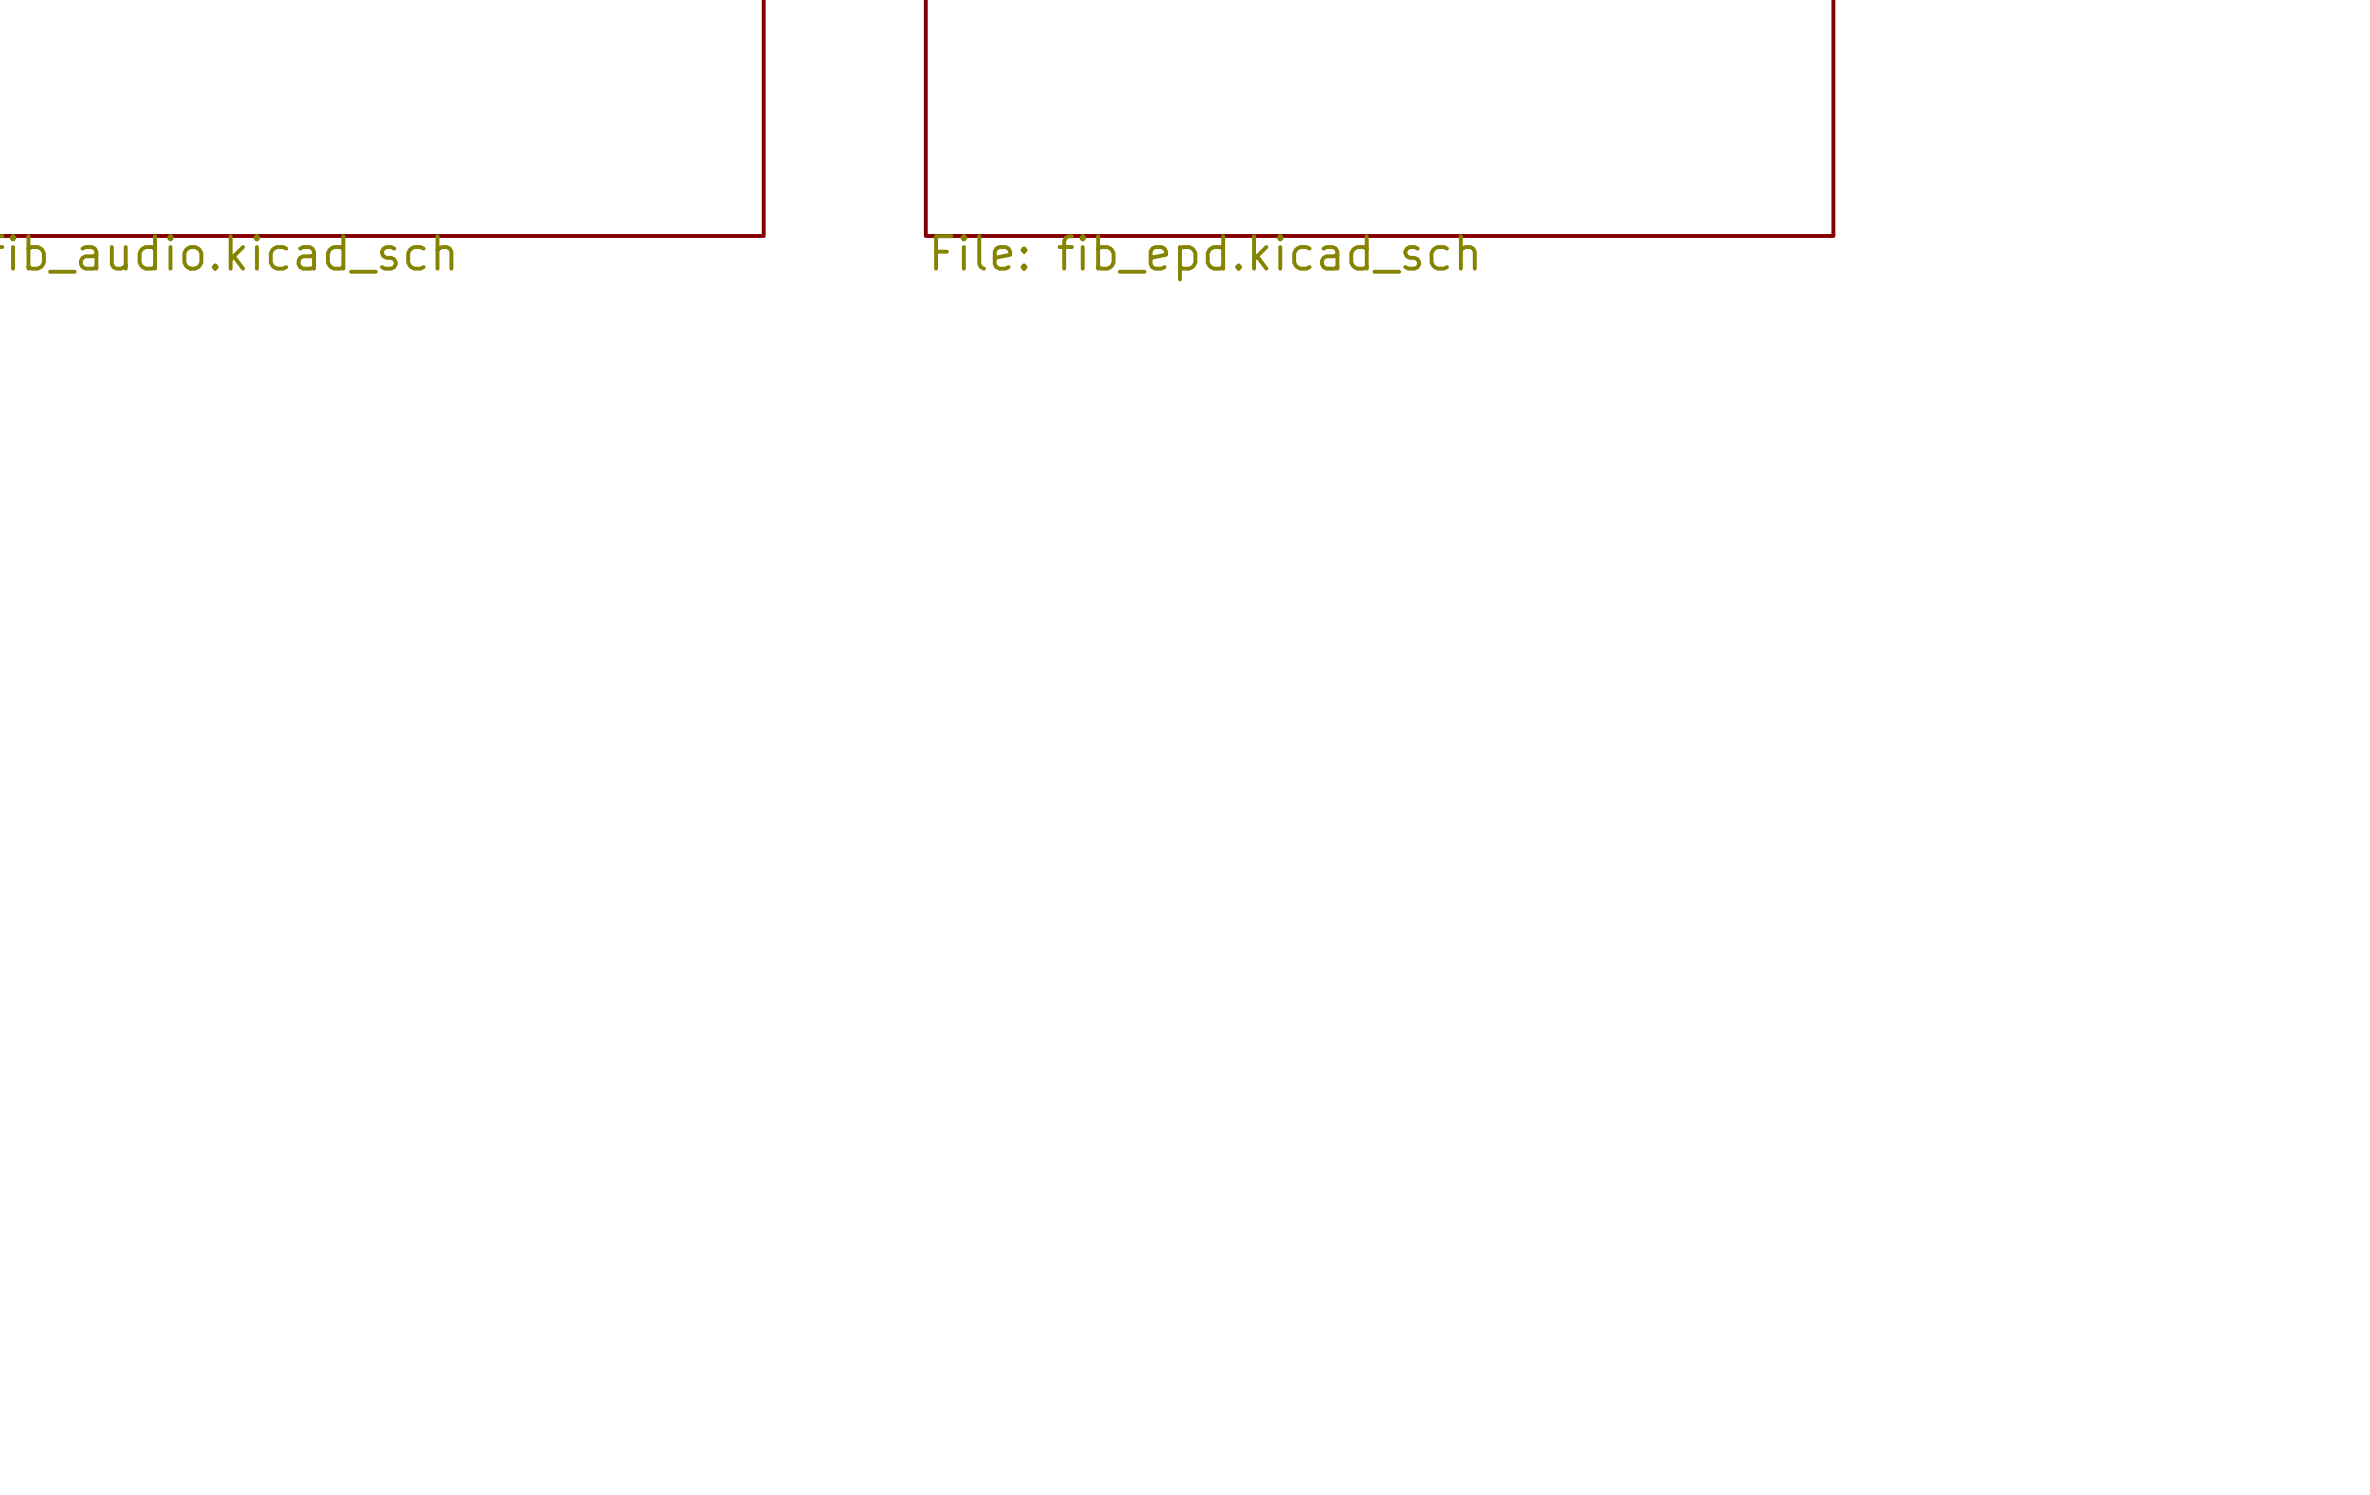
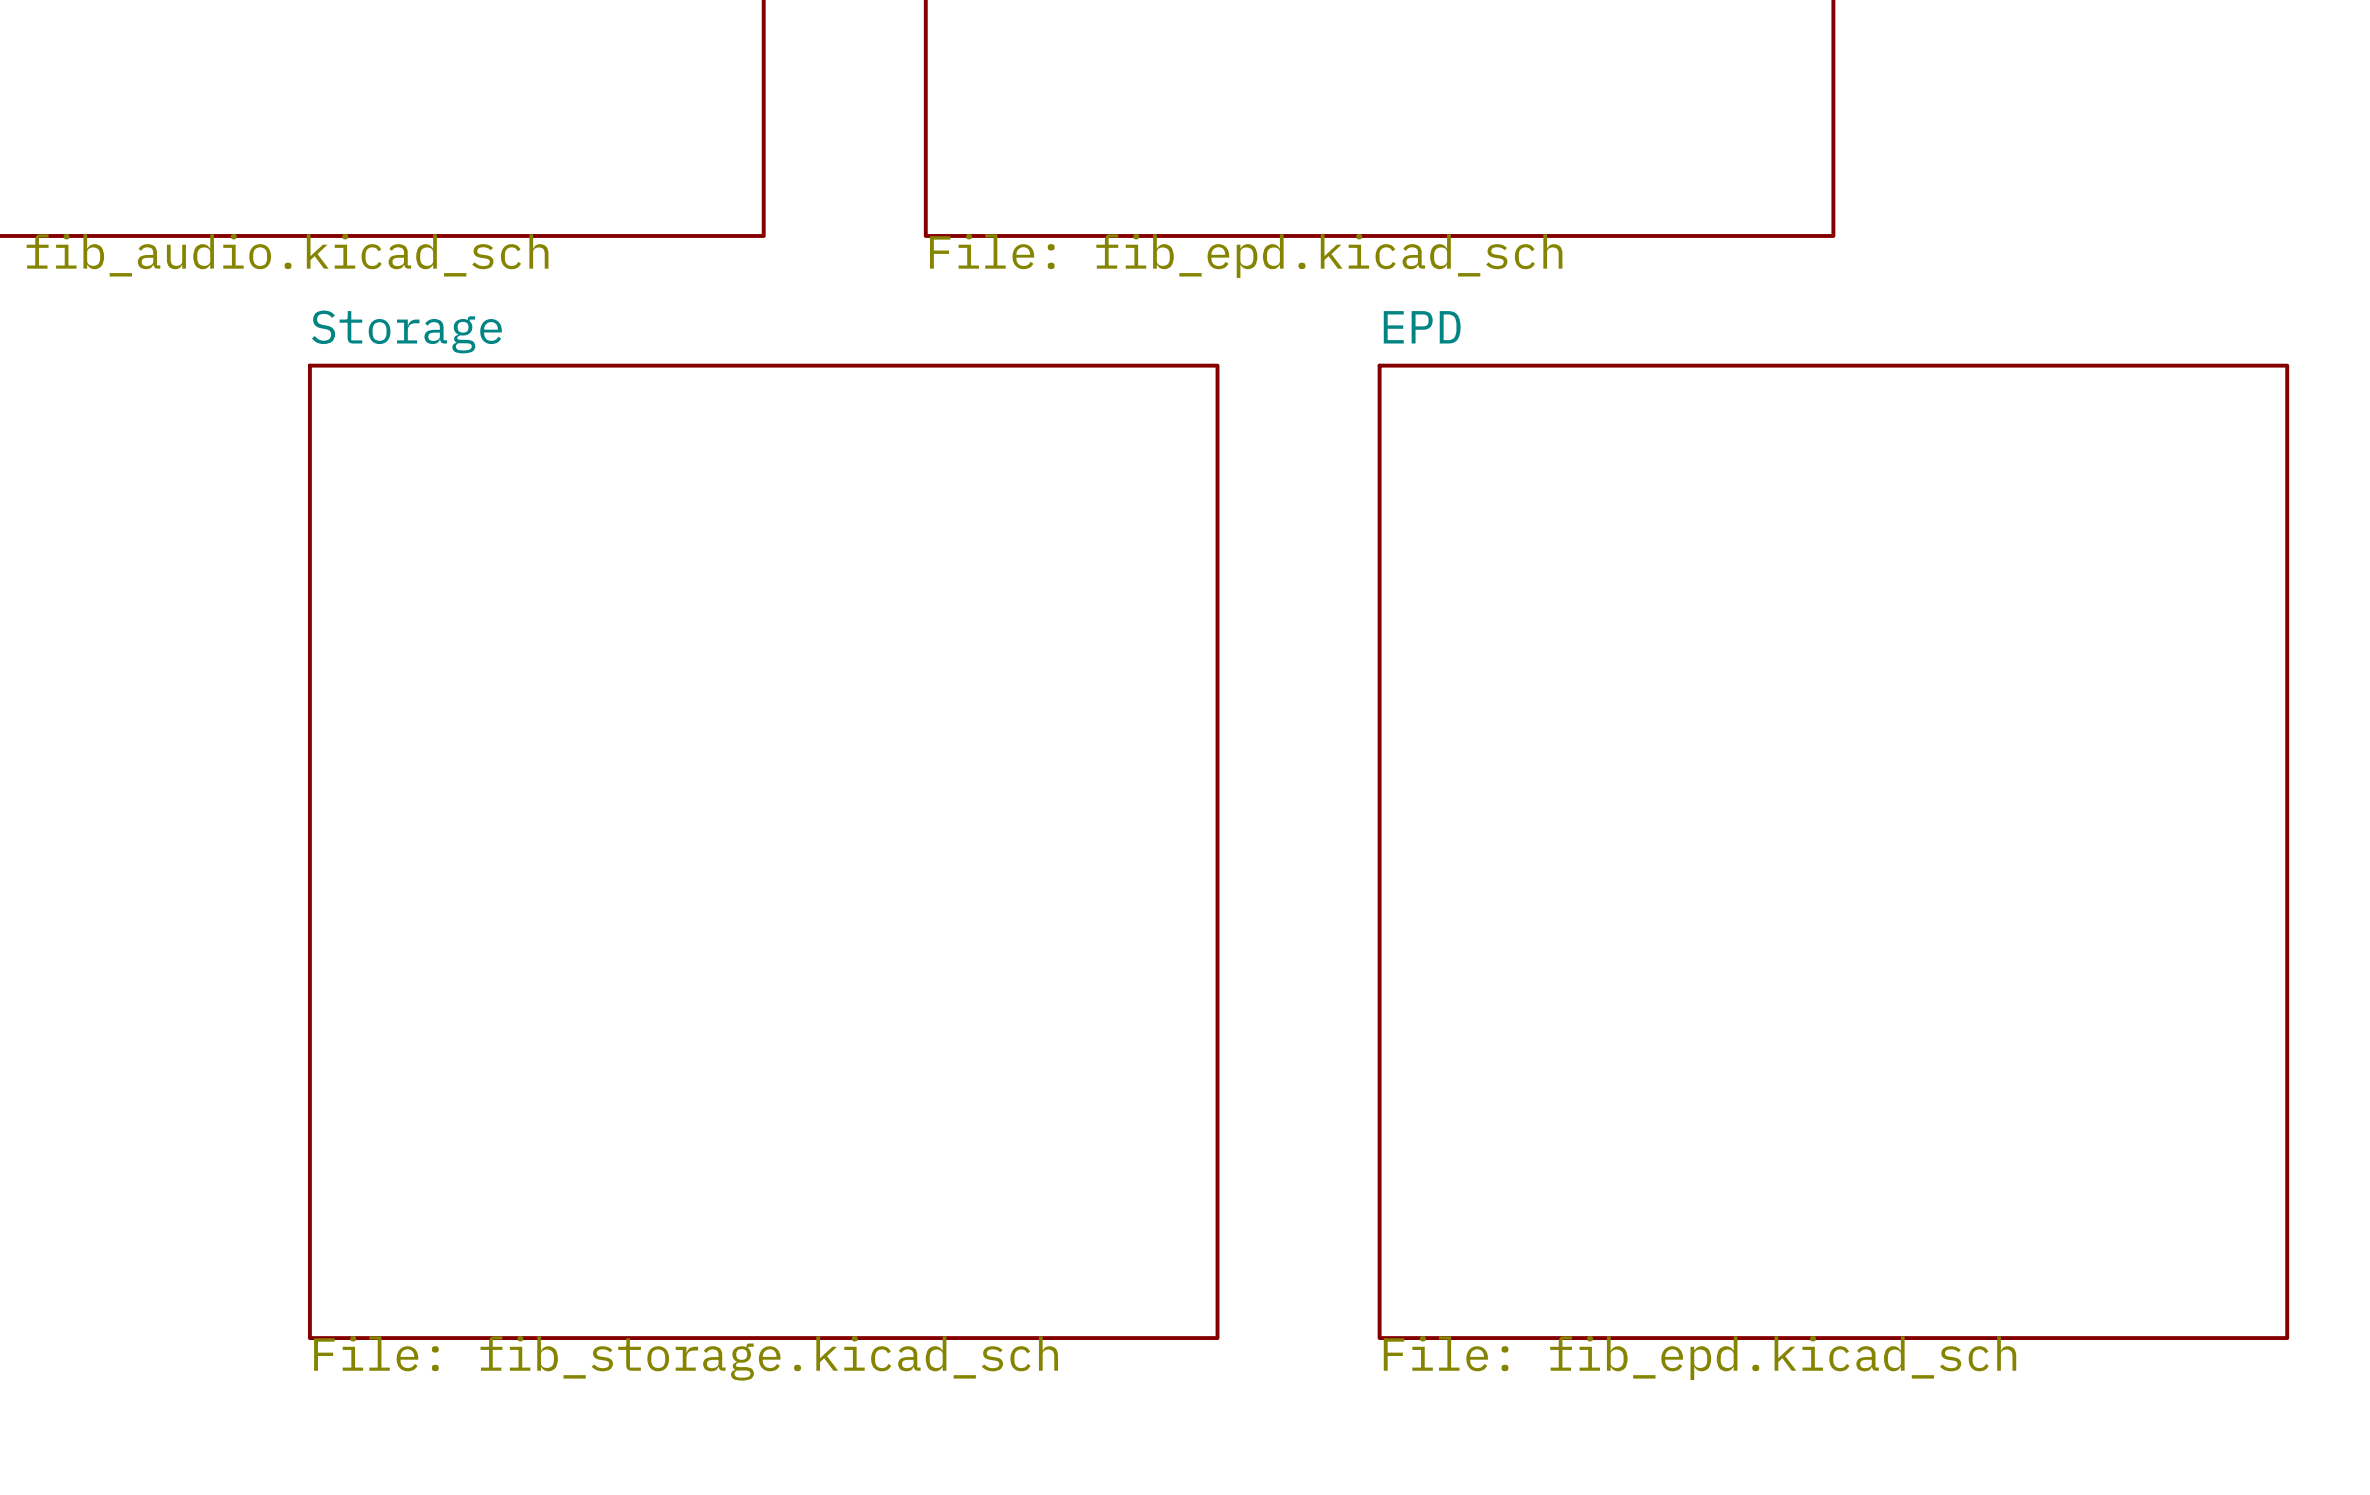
sheet Storage: none -> File: fib_storage.kicad_sch (763, 851)
sheet EPD: none -> File: fib_epd.kicad_sch (1833, 851)

